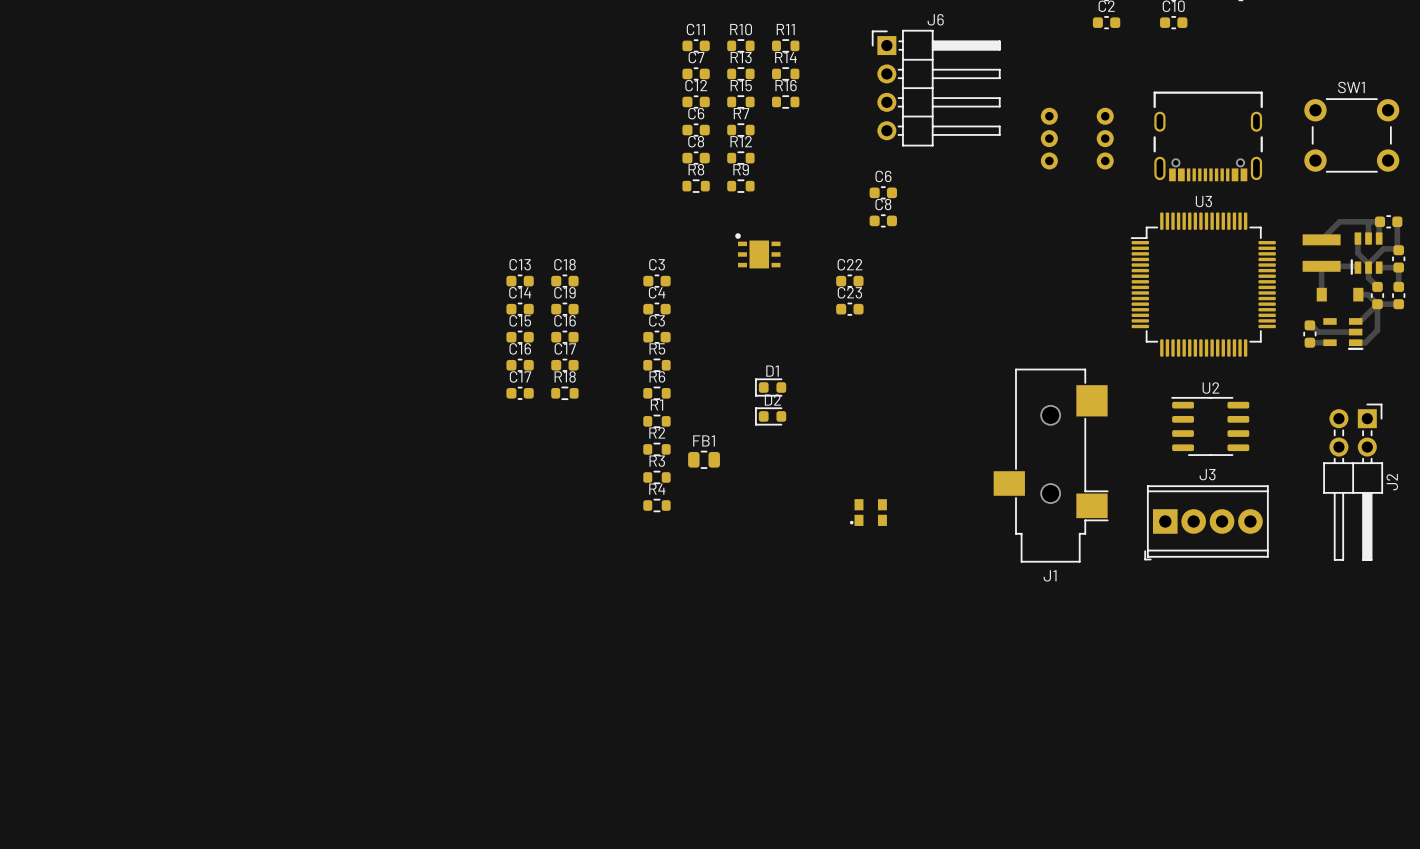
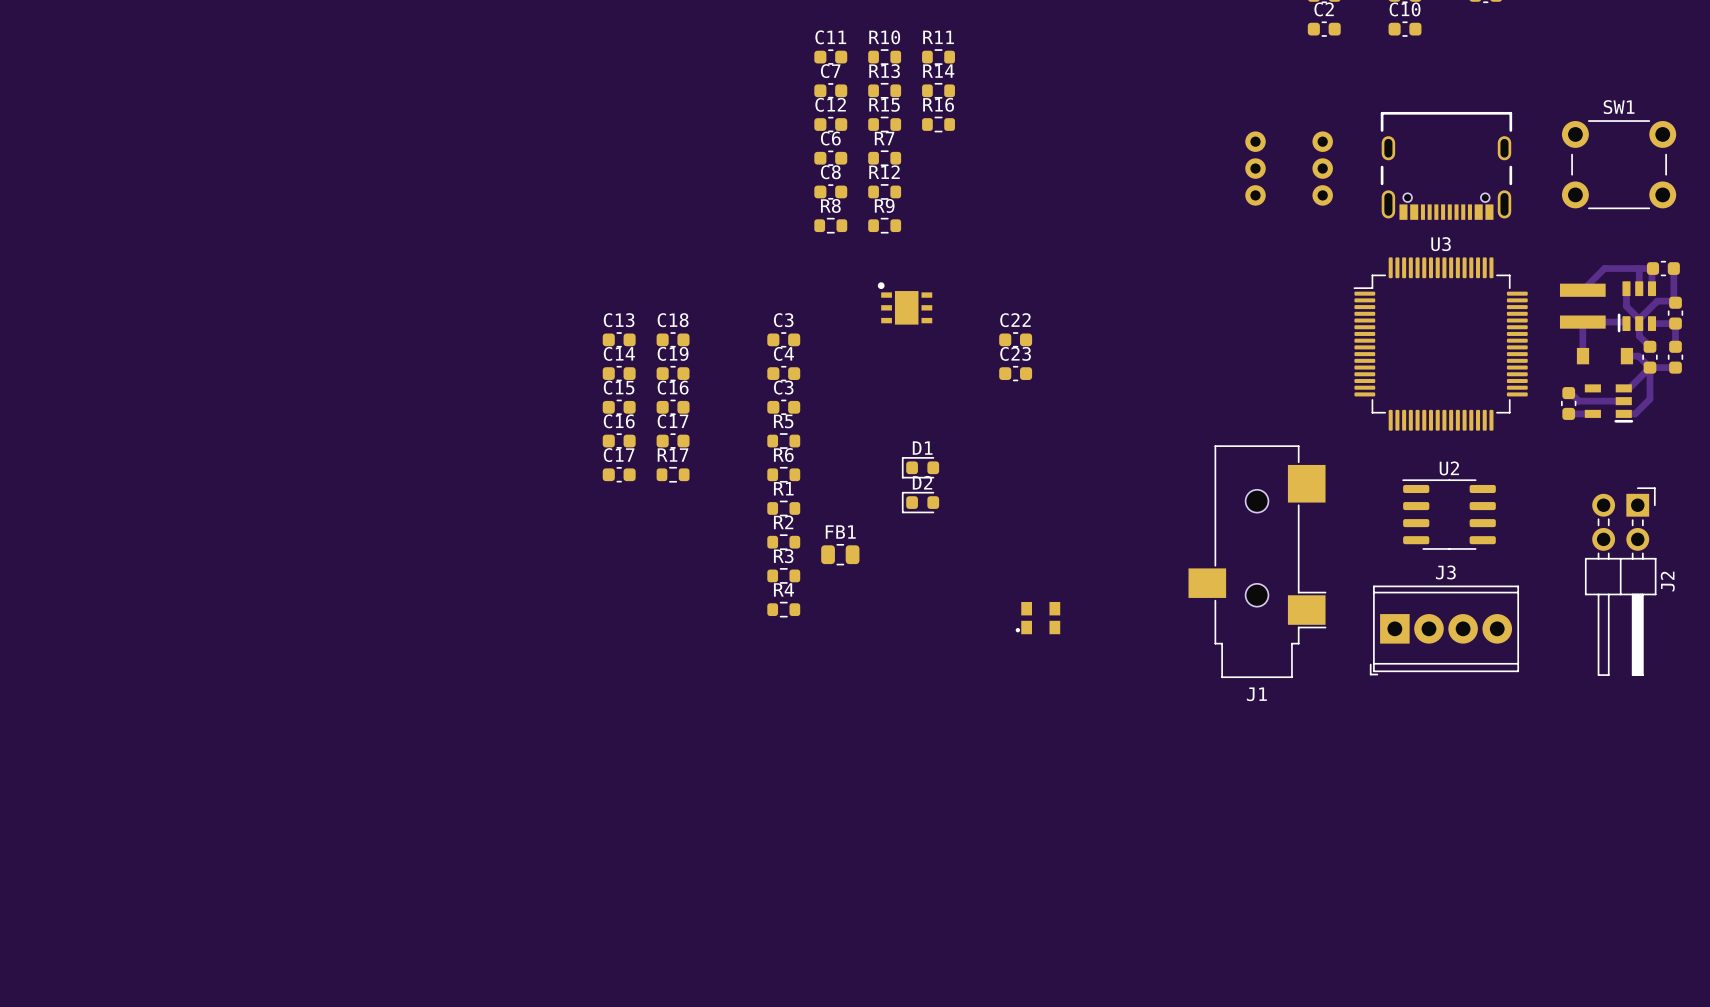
J6: (936, 88) -> none
C6: (883, 192) -> none
C8: (883, 220) -> none
R18 name: R18 (565, 376) -> R17 (673, 455)

